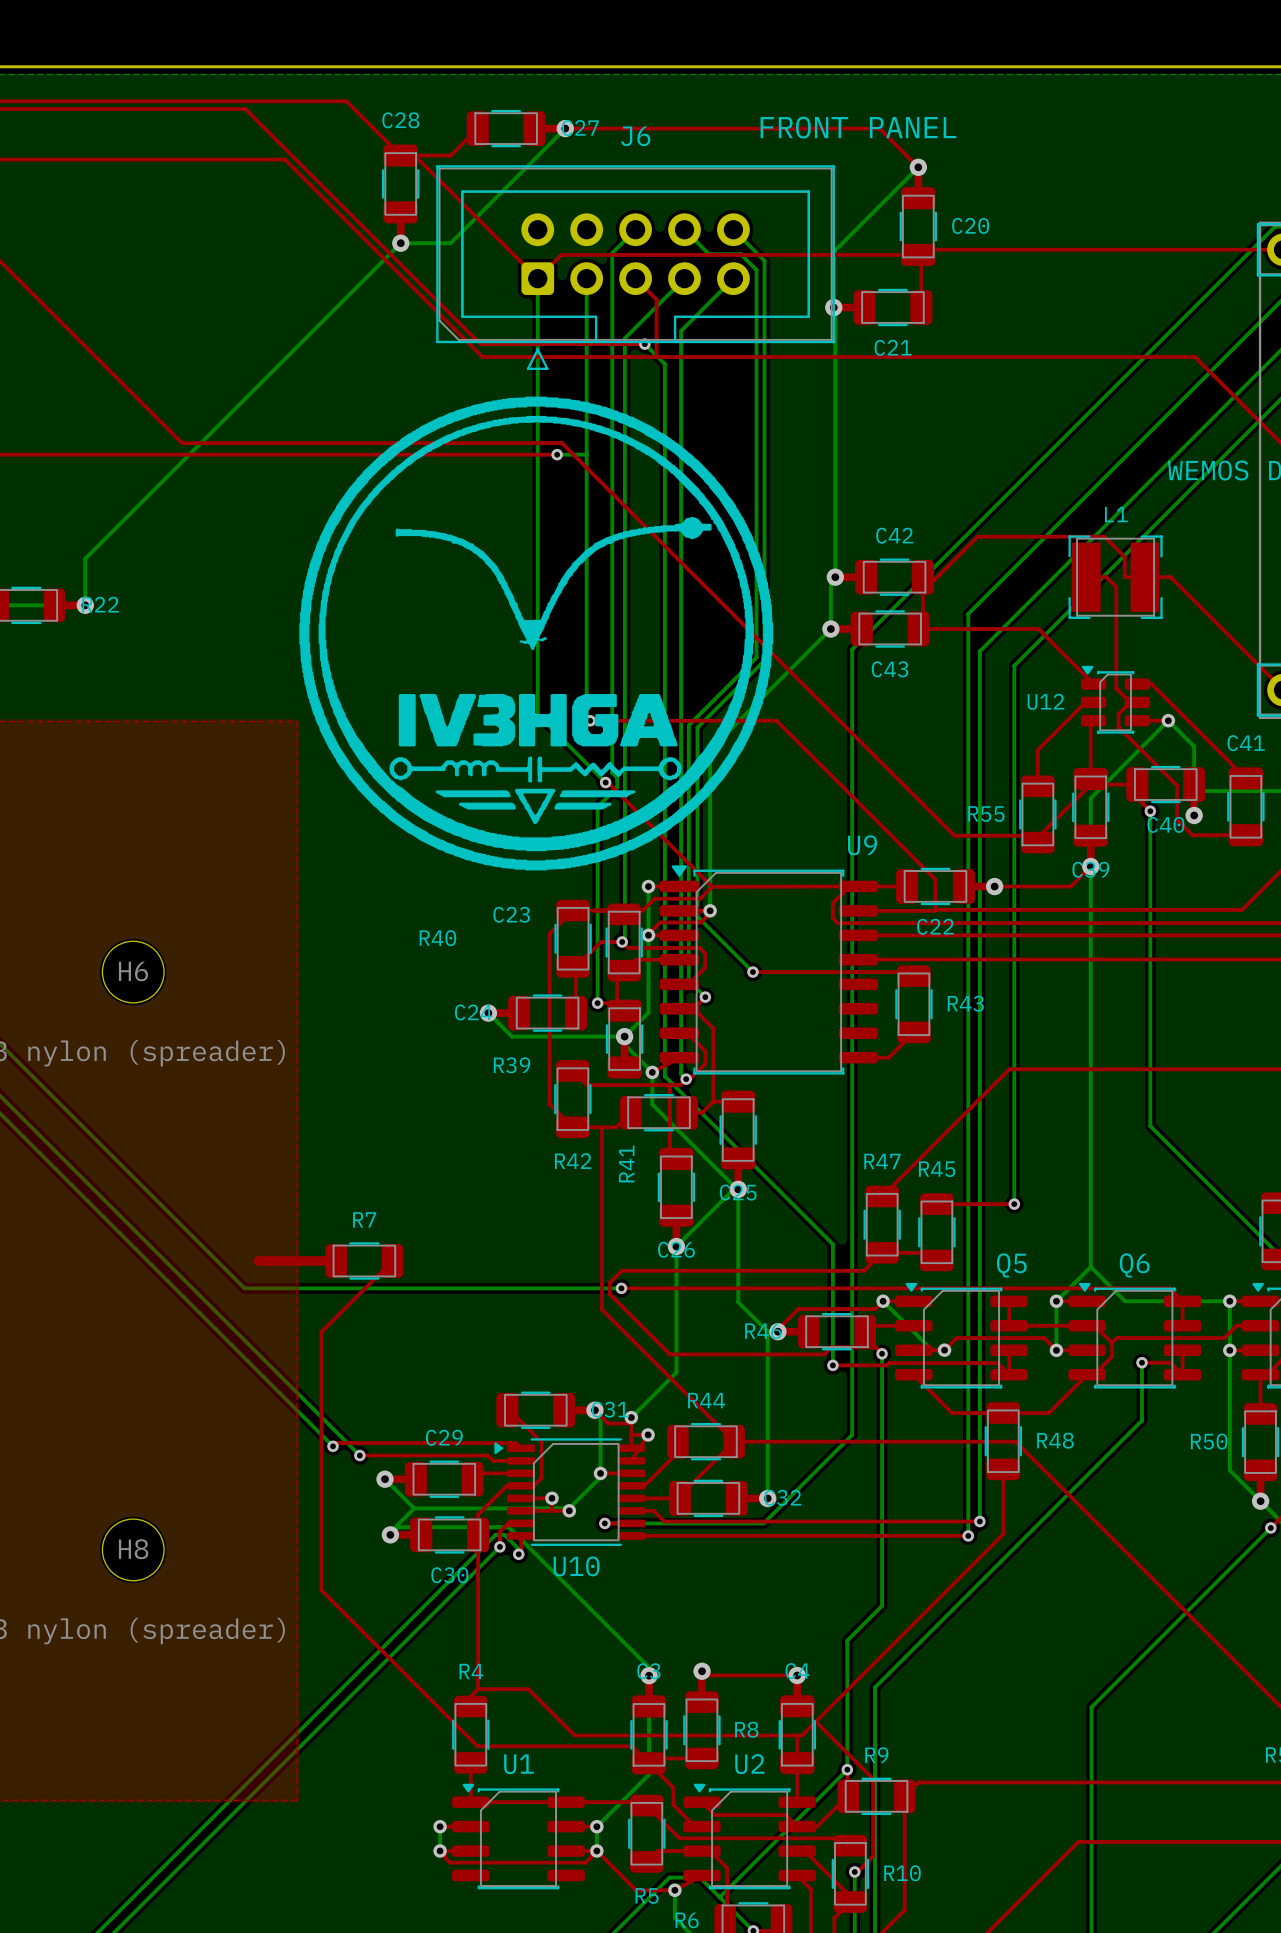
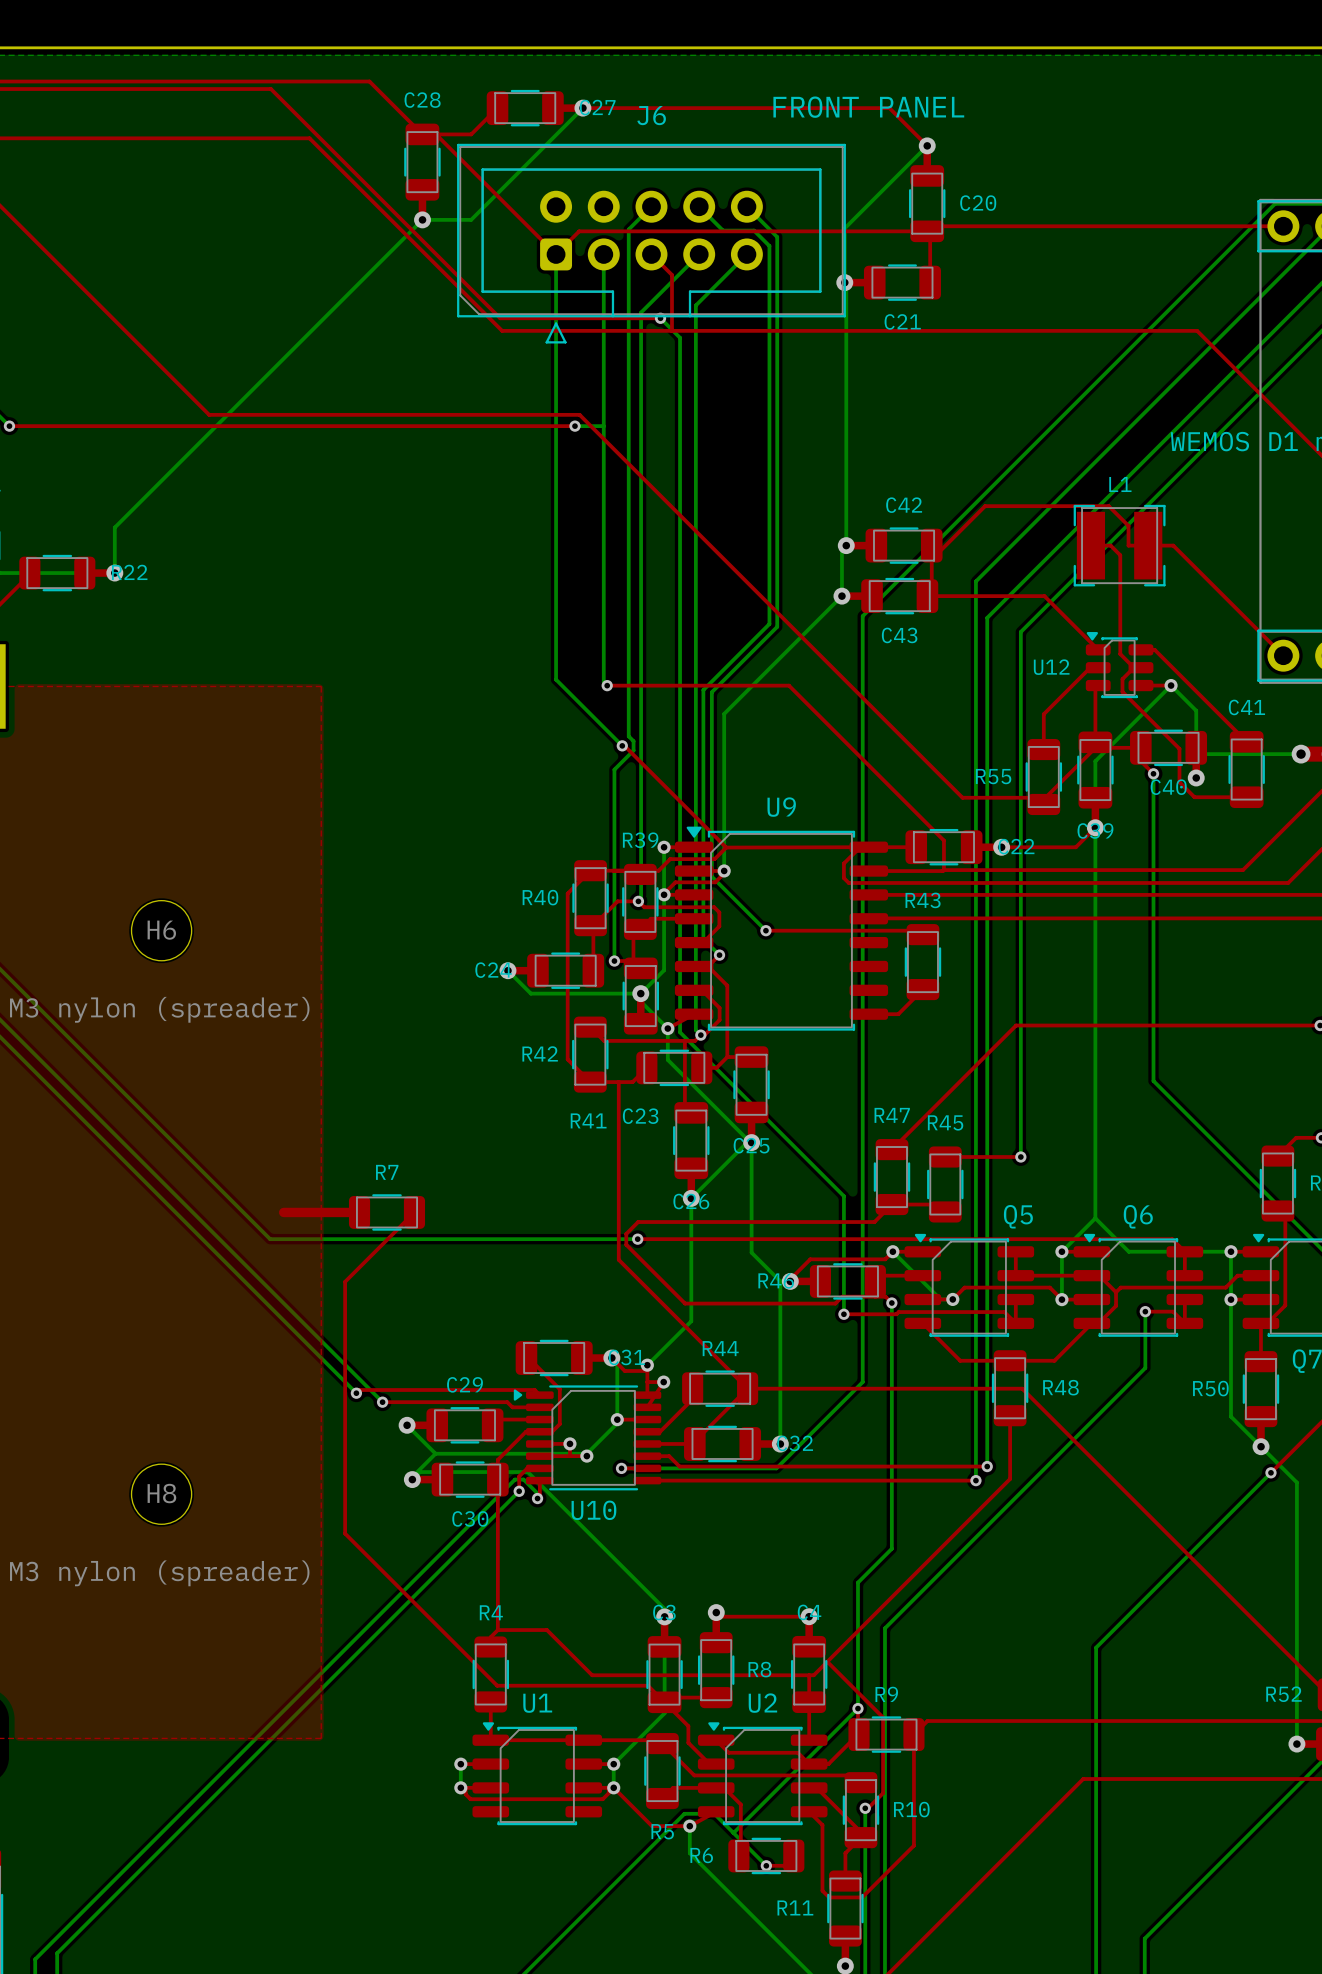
drawing: [299, 396, 774, 871] -> none
U9 name position: U9 (862, 845) -> U9 (781, 807)
C23 name position: C23 (511, 914) -> C23 (640, 1116)
C22 name position: C22 (935, 926) -> C22 (1016, 846)
R40 name position: R40 (437, 938) -> R40 (540, 897)
R43 name position: R43 (965, 1003) -> R43 (923, 900)
R39 name position: R39 (512, 1065) -> R39 (640, 840)
R42 name position: R42 (573, 1161) -> R42 (540, 1053)
R41 name rotation: 0° (626, 1164) -> 90° clockwise (588, 1120)
R41 name position: R41 (626, 1164) -> R41 (588, 1120)

